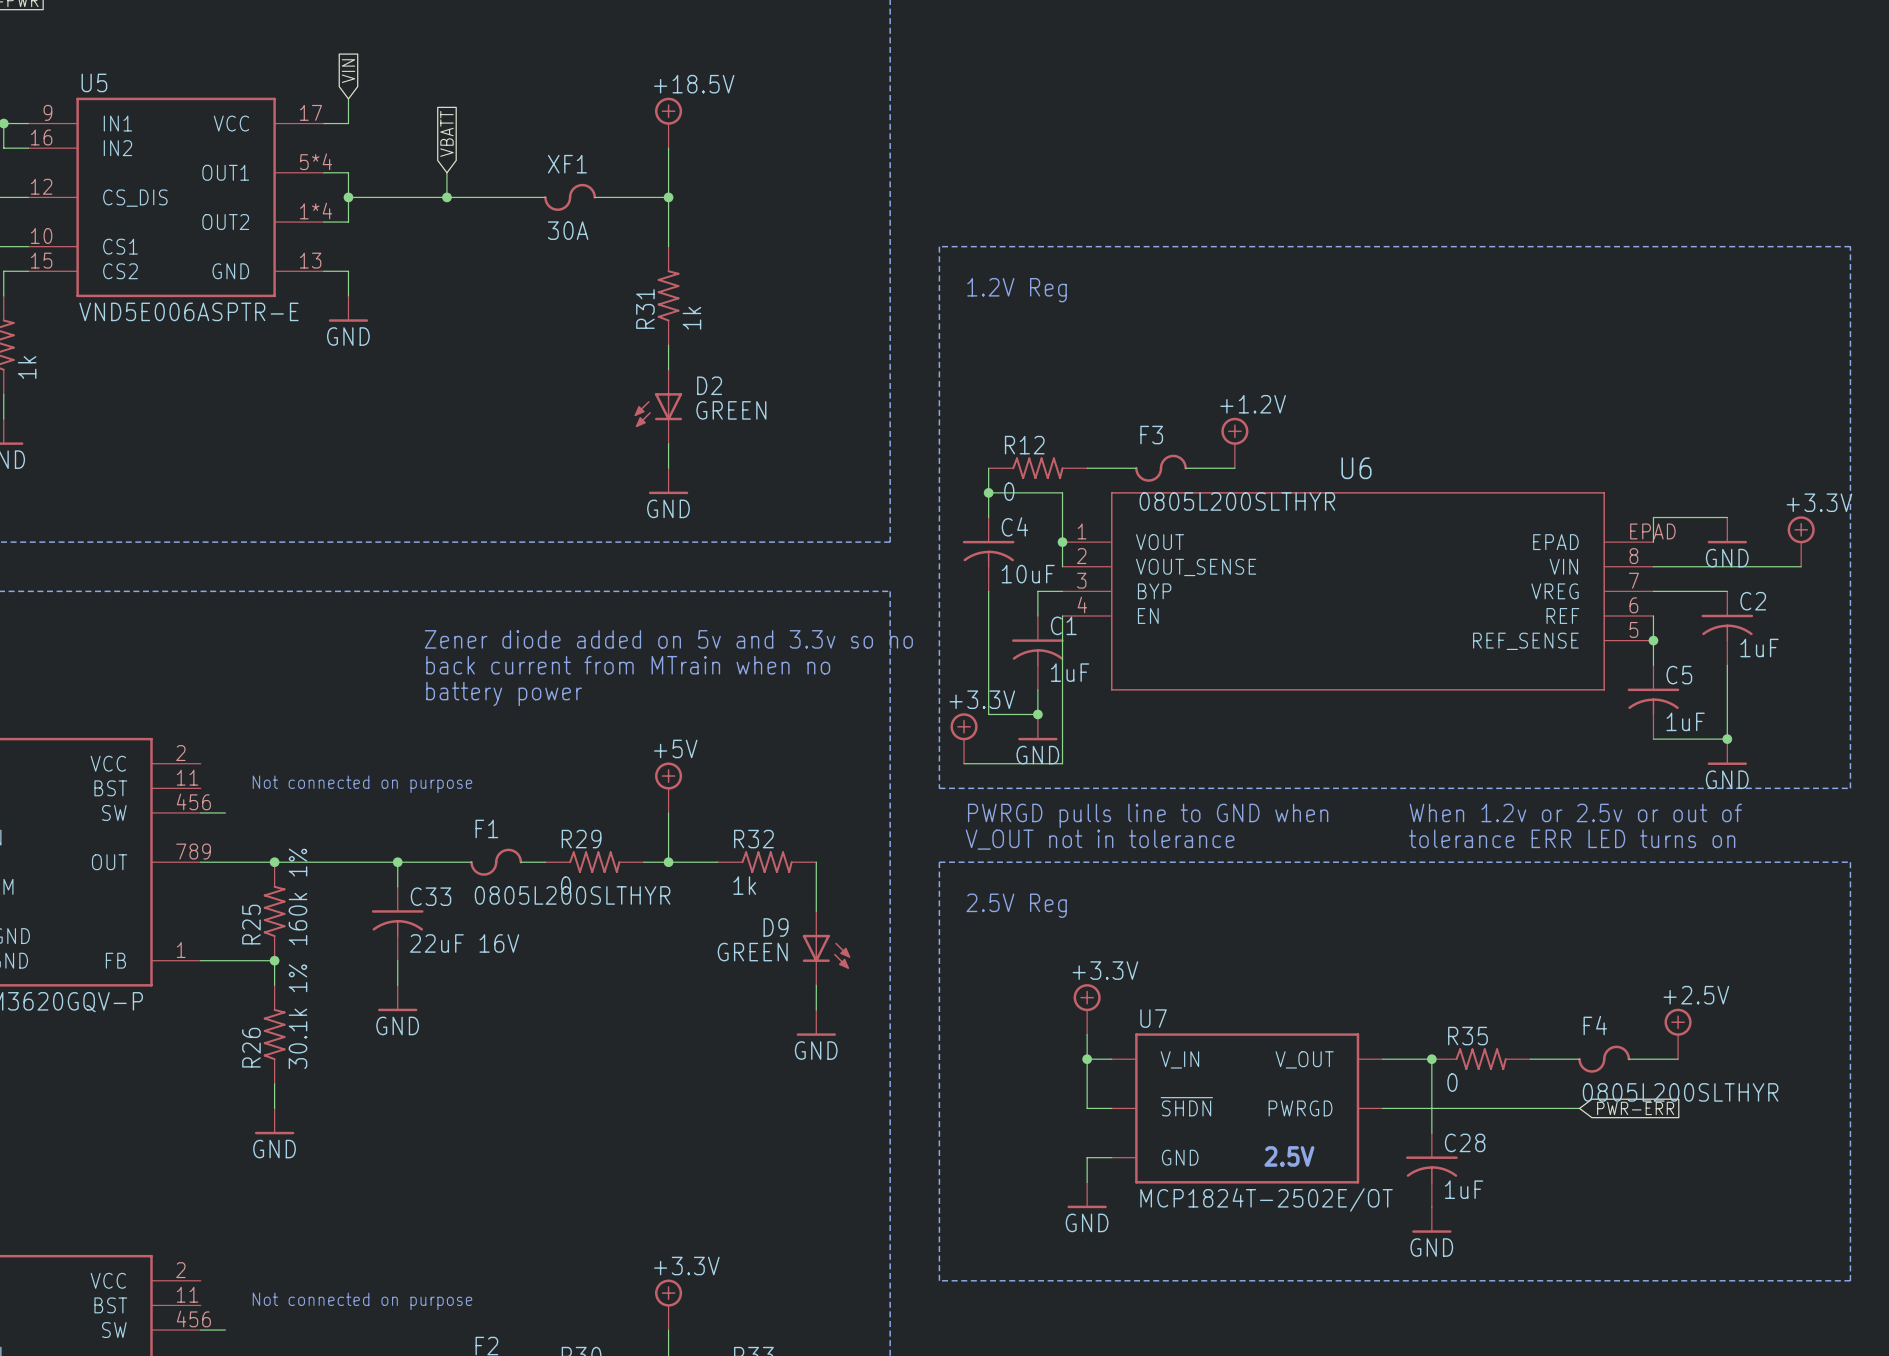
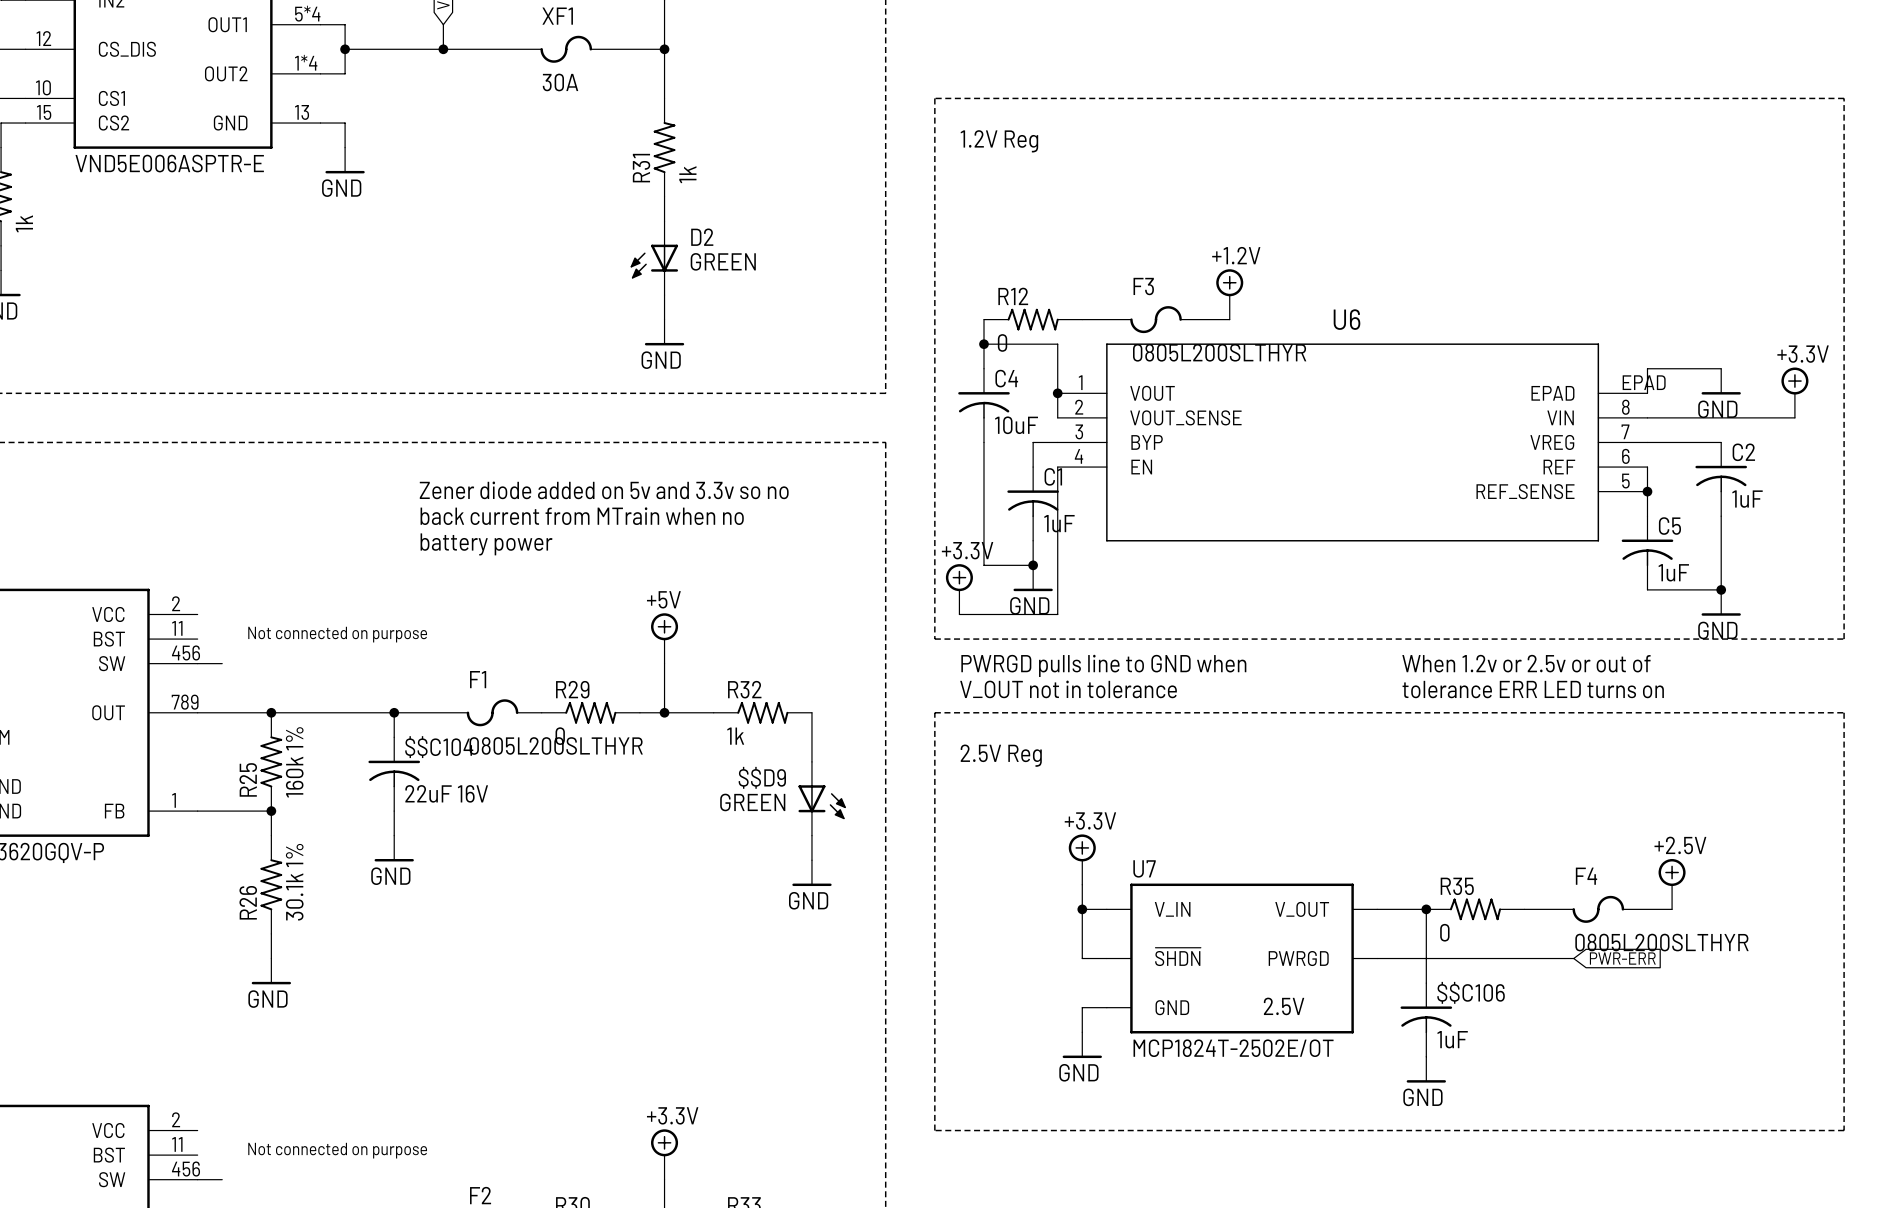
C33 name: C33 (431, 896) -> $$C104 (439, 747)
D9 name: D9 (775, 927) -> $$D9 (762, 777)
C28 name: C28 (1465, 1142) -> $$C106 (1471, 992)

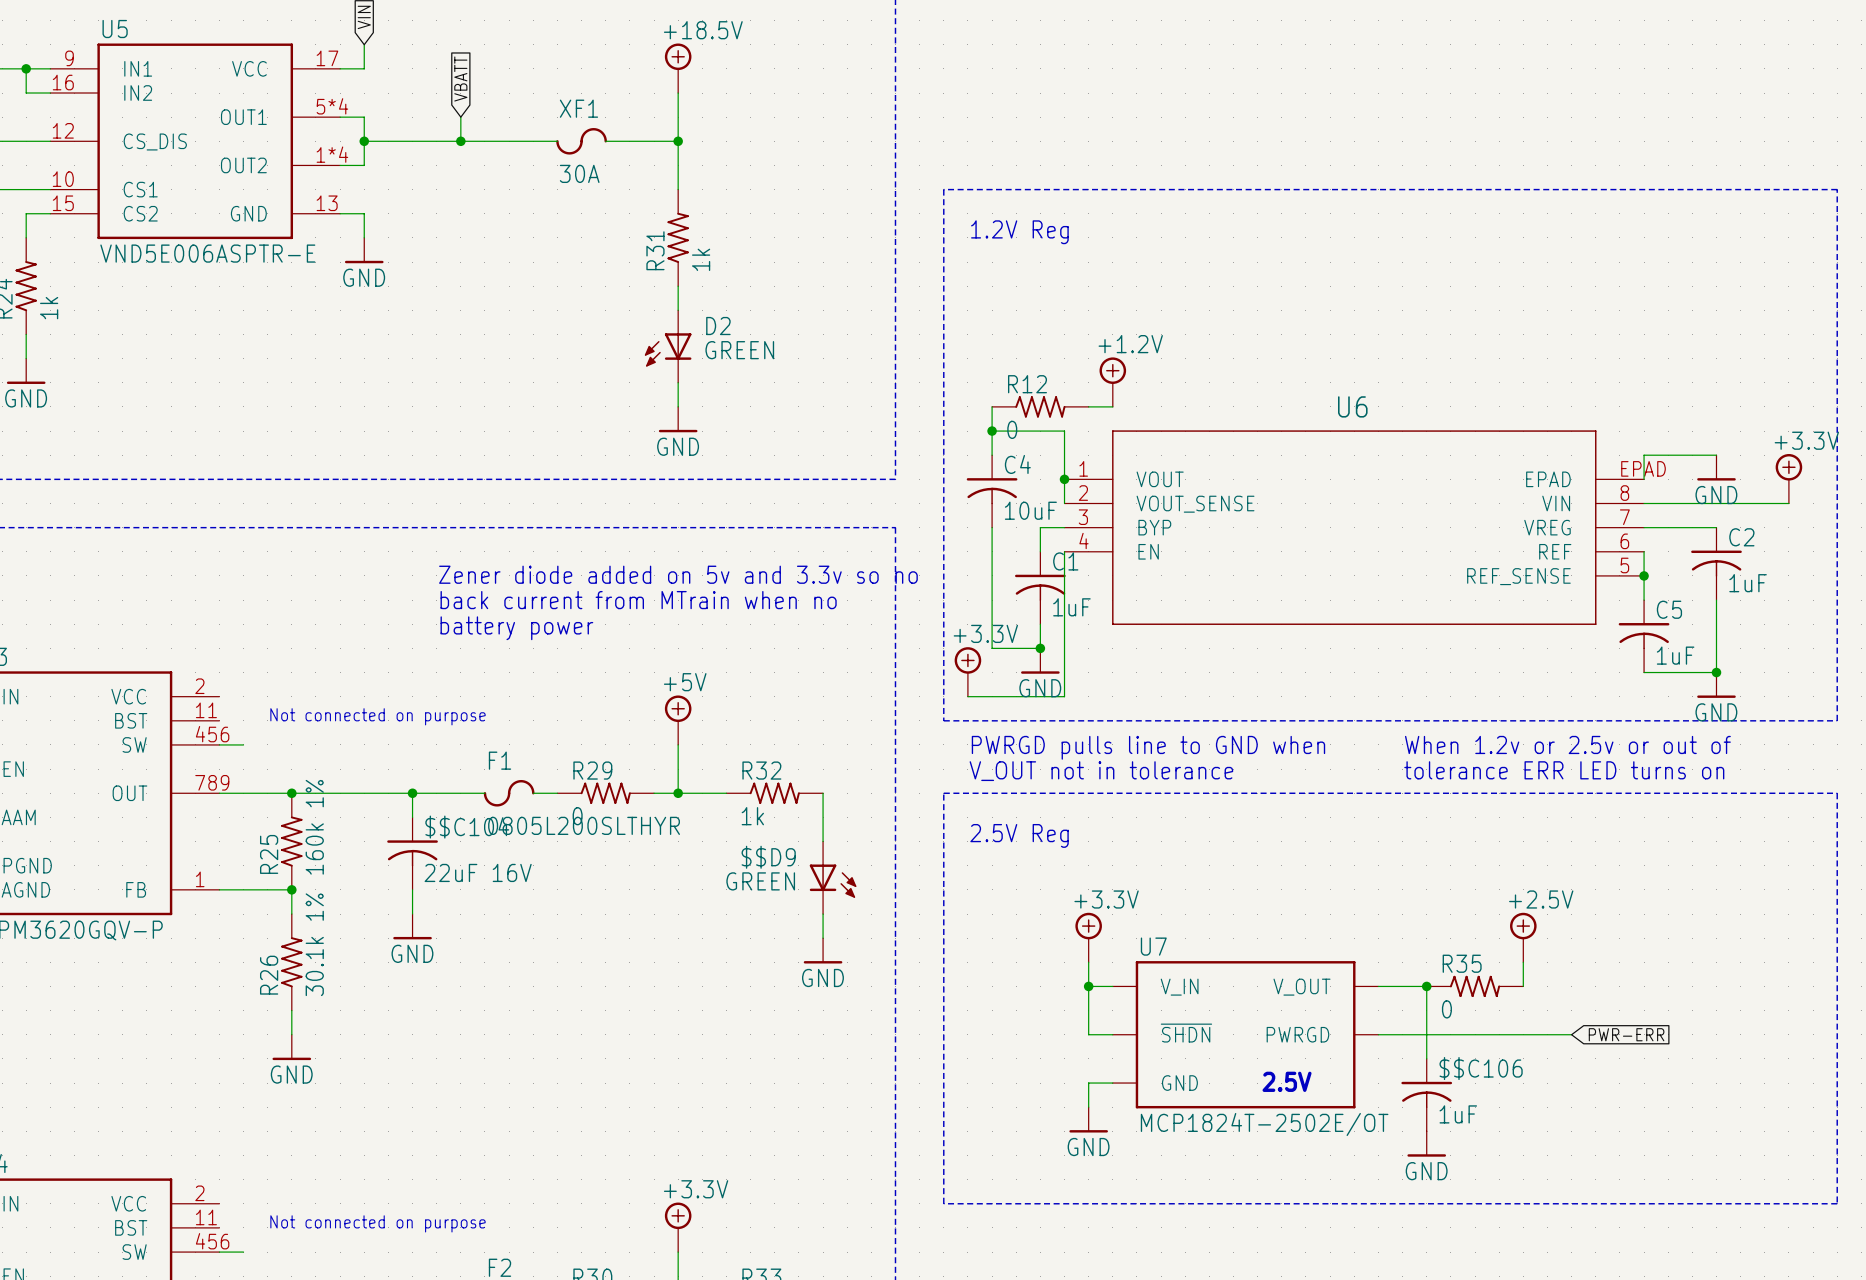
power symbol position: +1.2V (1229, 294) -> +1.2V (1112, 382)
wire: (1106, 319) (1131, 319) -> none
F3: 0805L200SLTHYR (1156, 319) -> none
wire: (1180, 319) (1229, 319) -> none
power symbol position: +2.5V (1672, 884) -> +2.5V (1523, 937)
wire: (1524, 909) (1573, 909) -> (1523, 986) (1523, 962)
F4: 0805L200SLTHYR (1598, 909) -> none
wire: (1622, 909) (1672, 909) -> none

